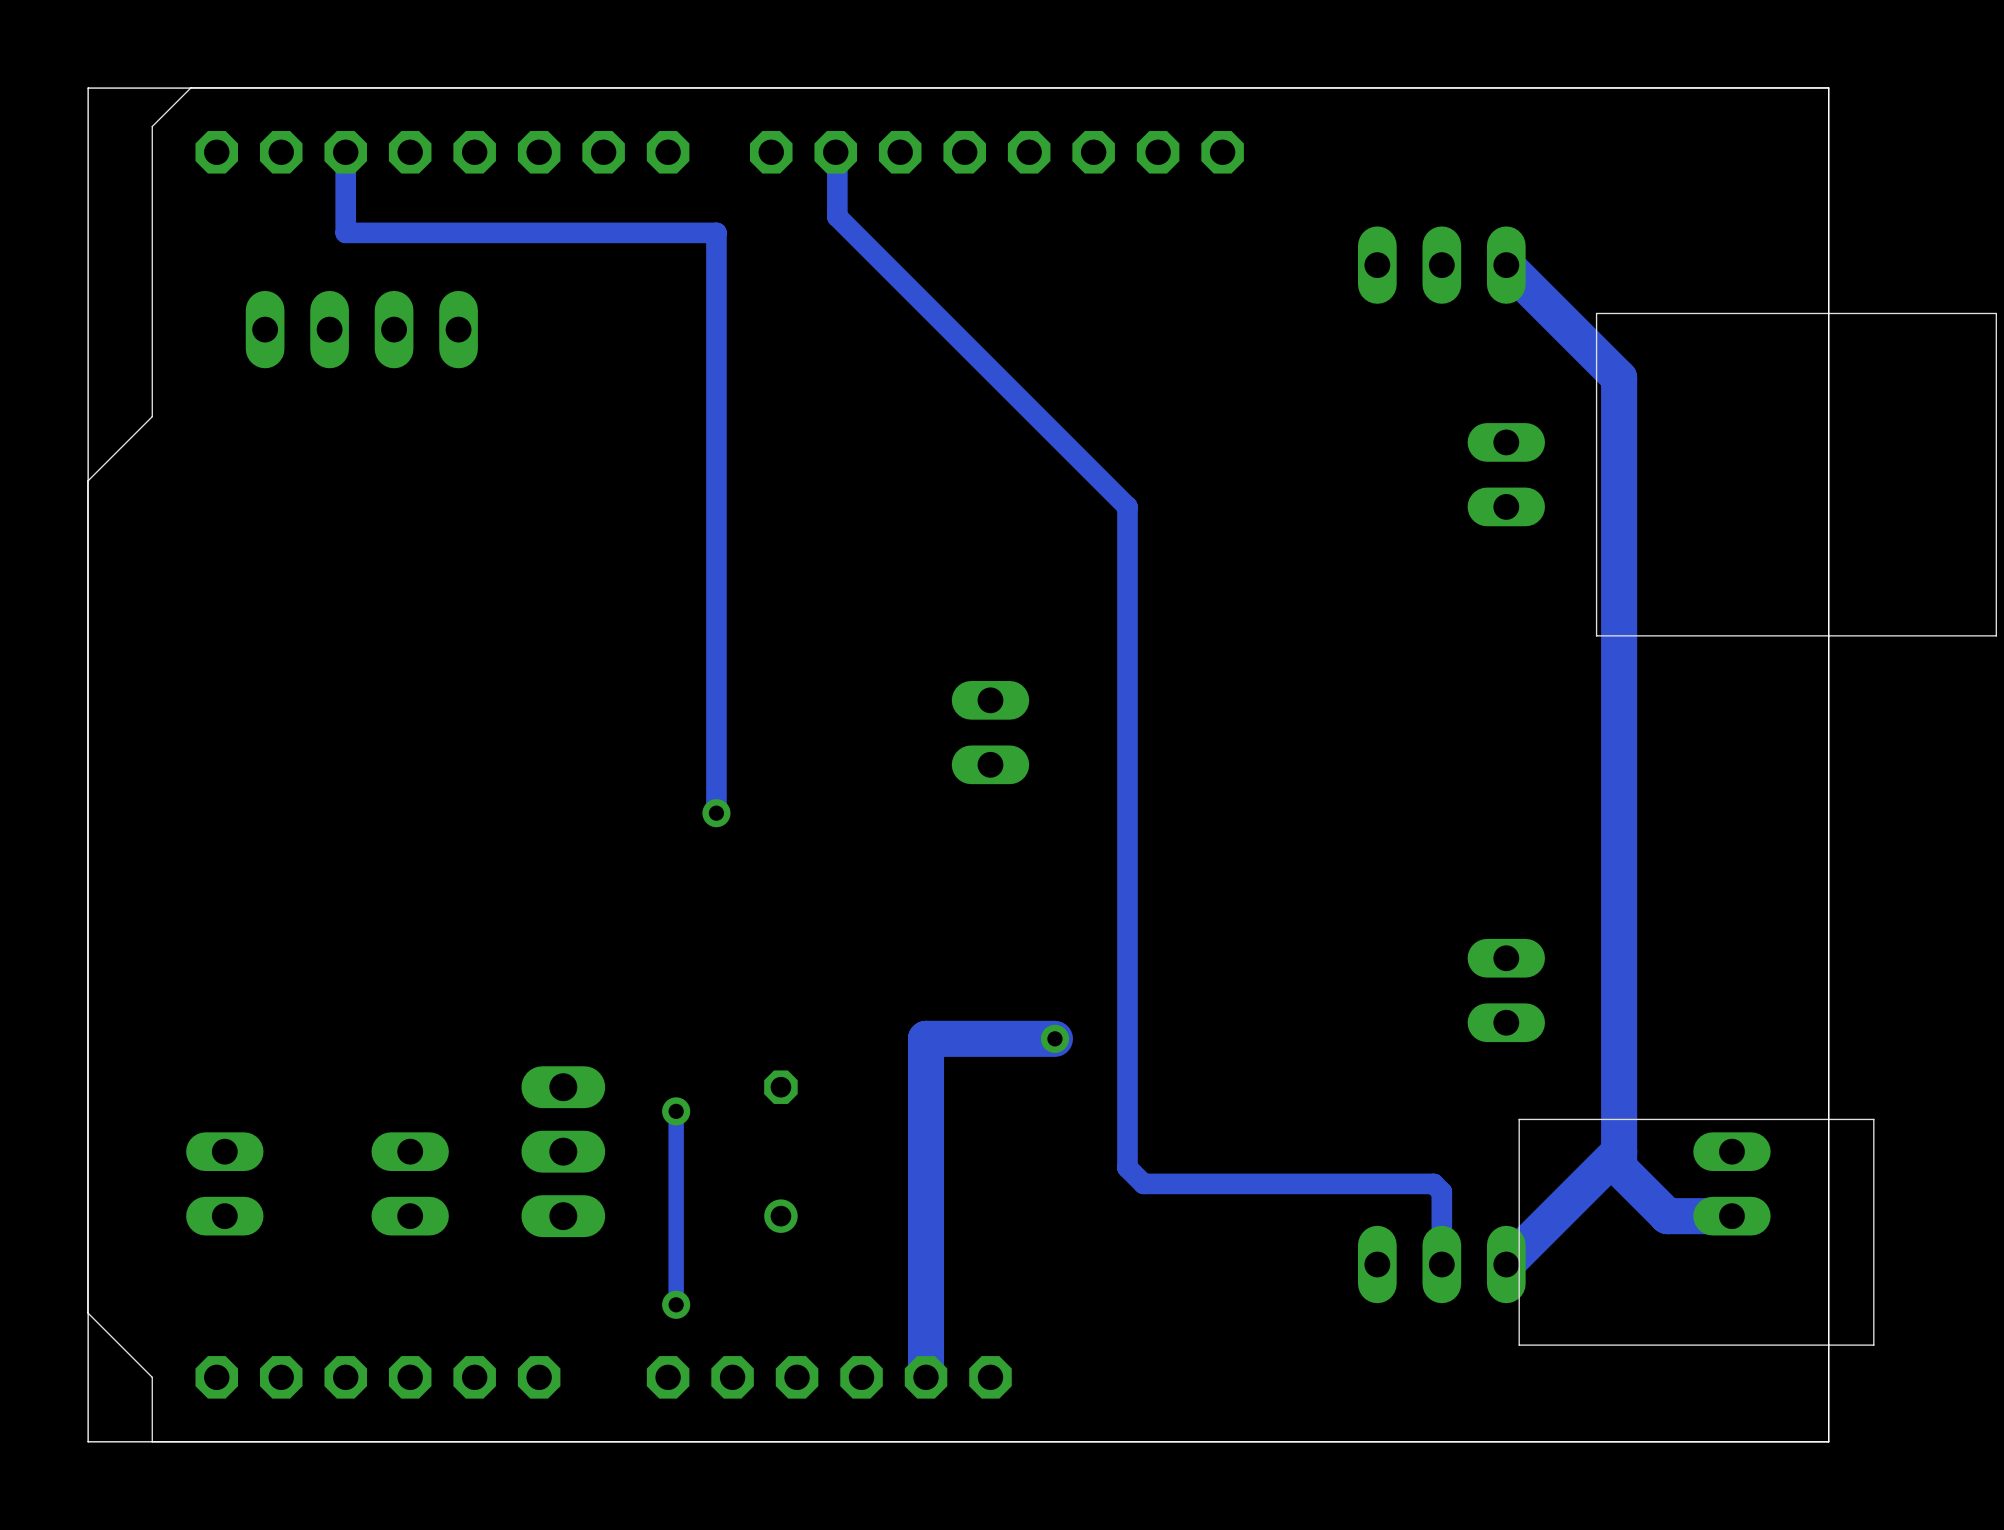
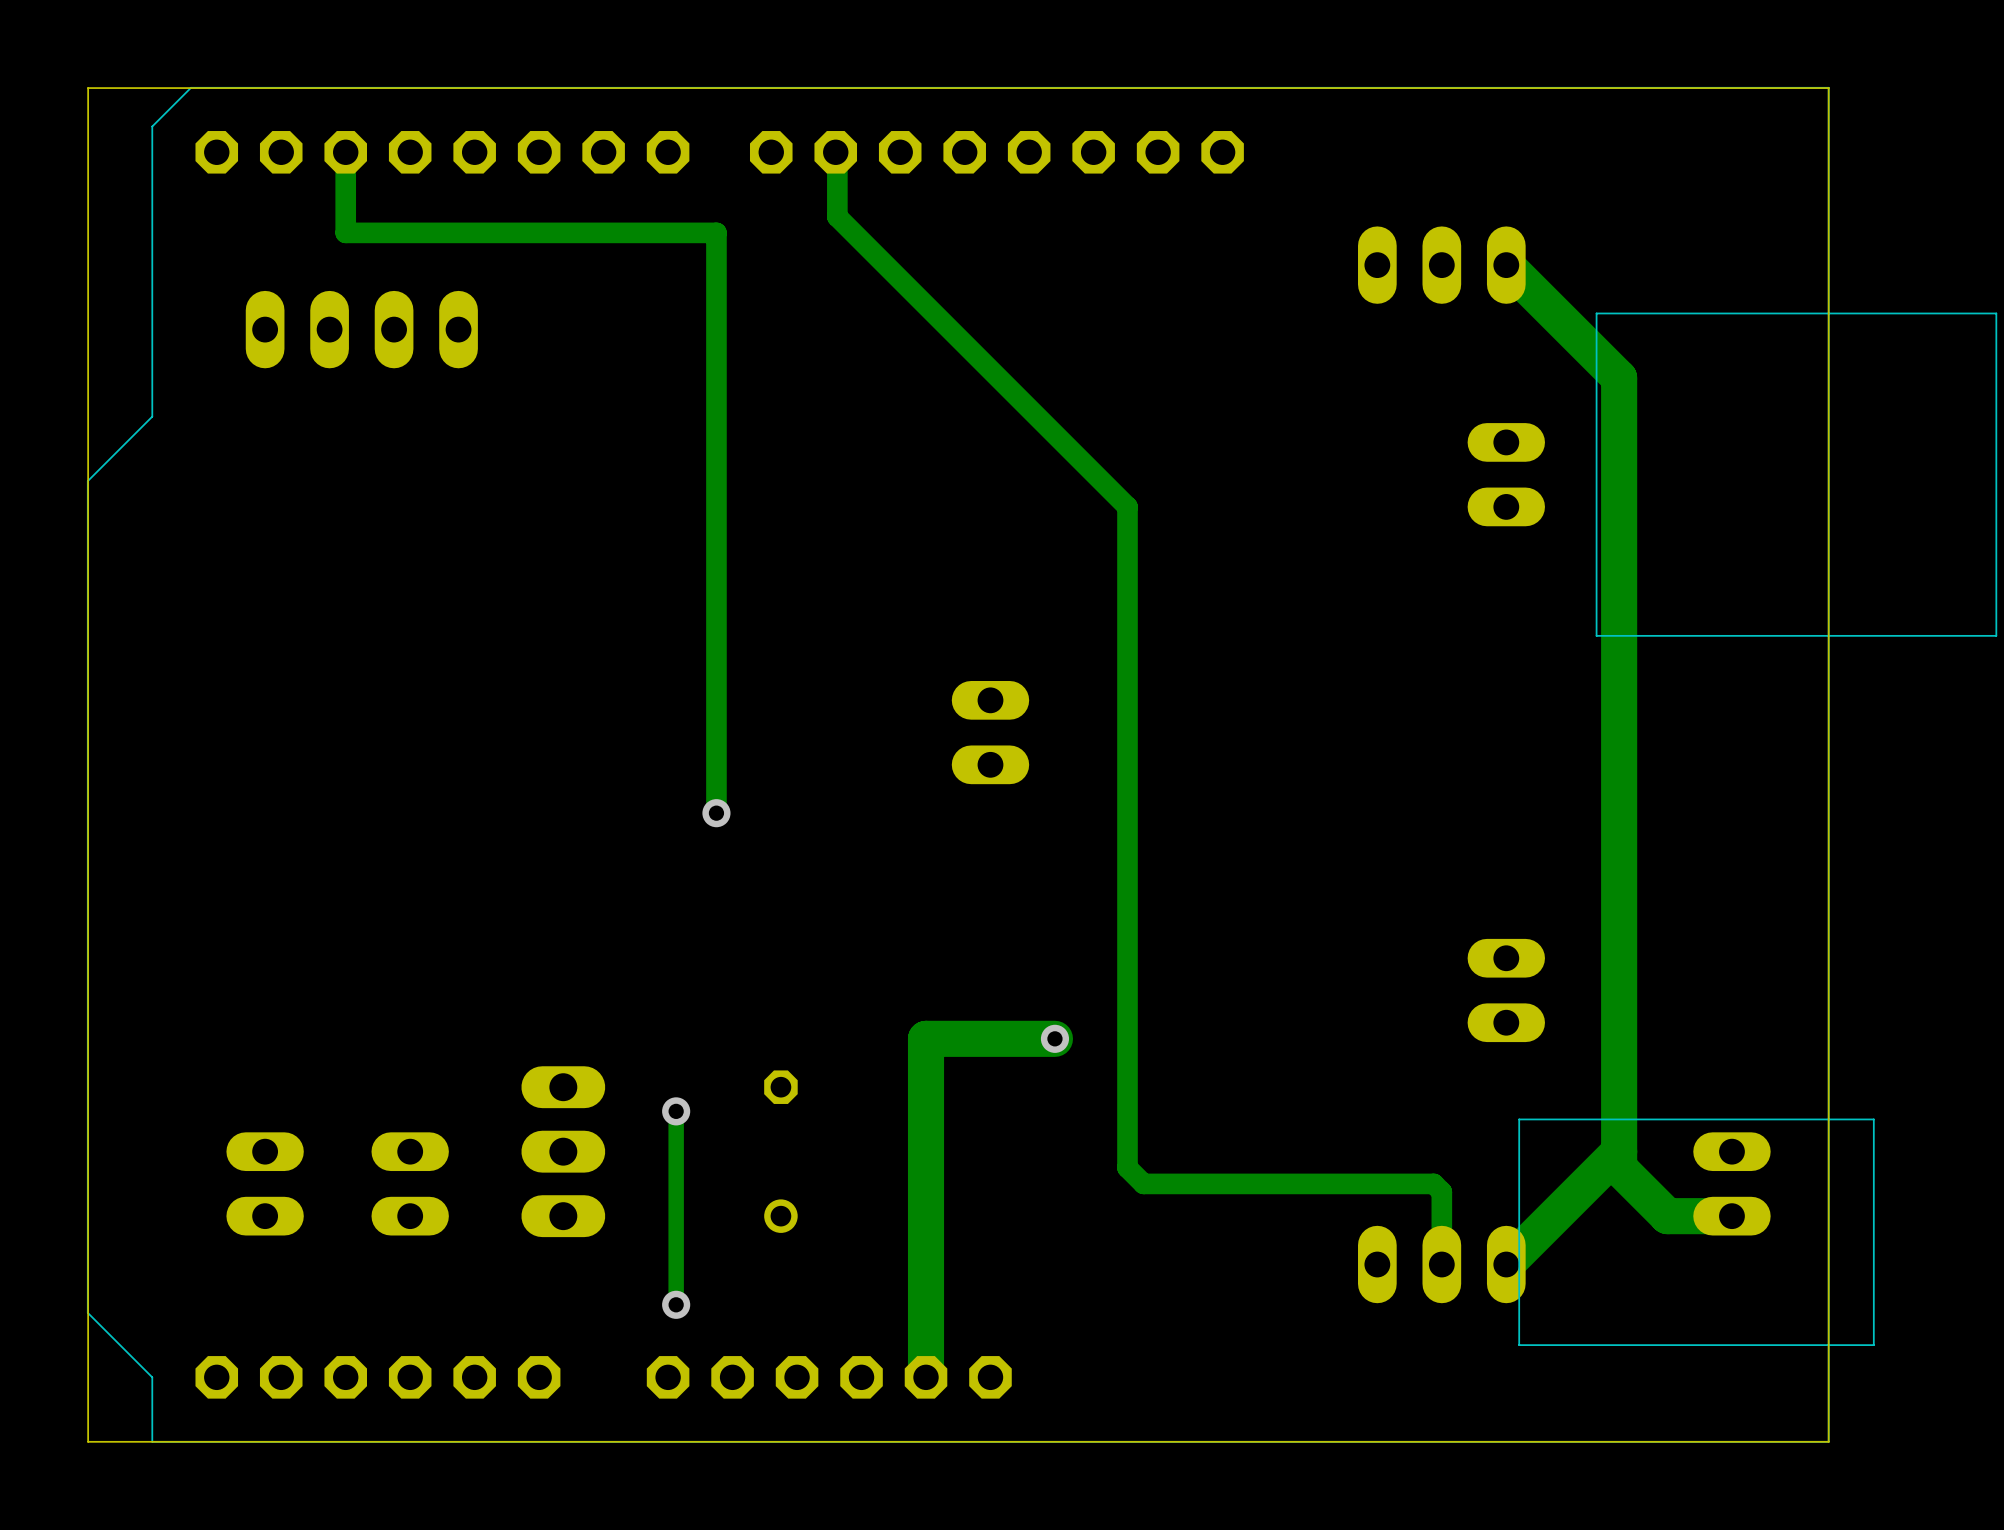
part position: (224, 1183) -> (265, 1183)

